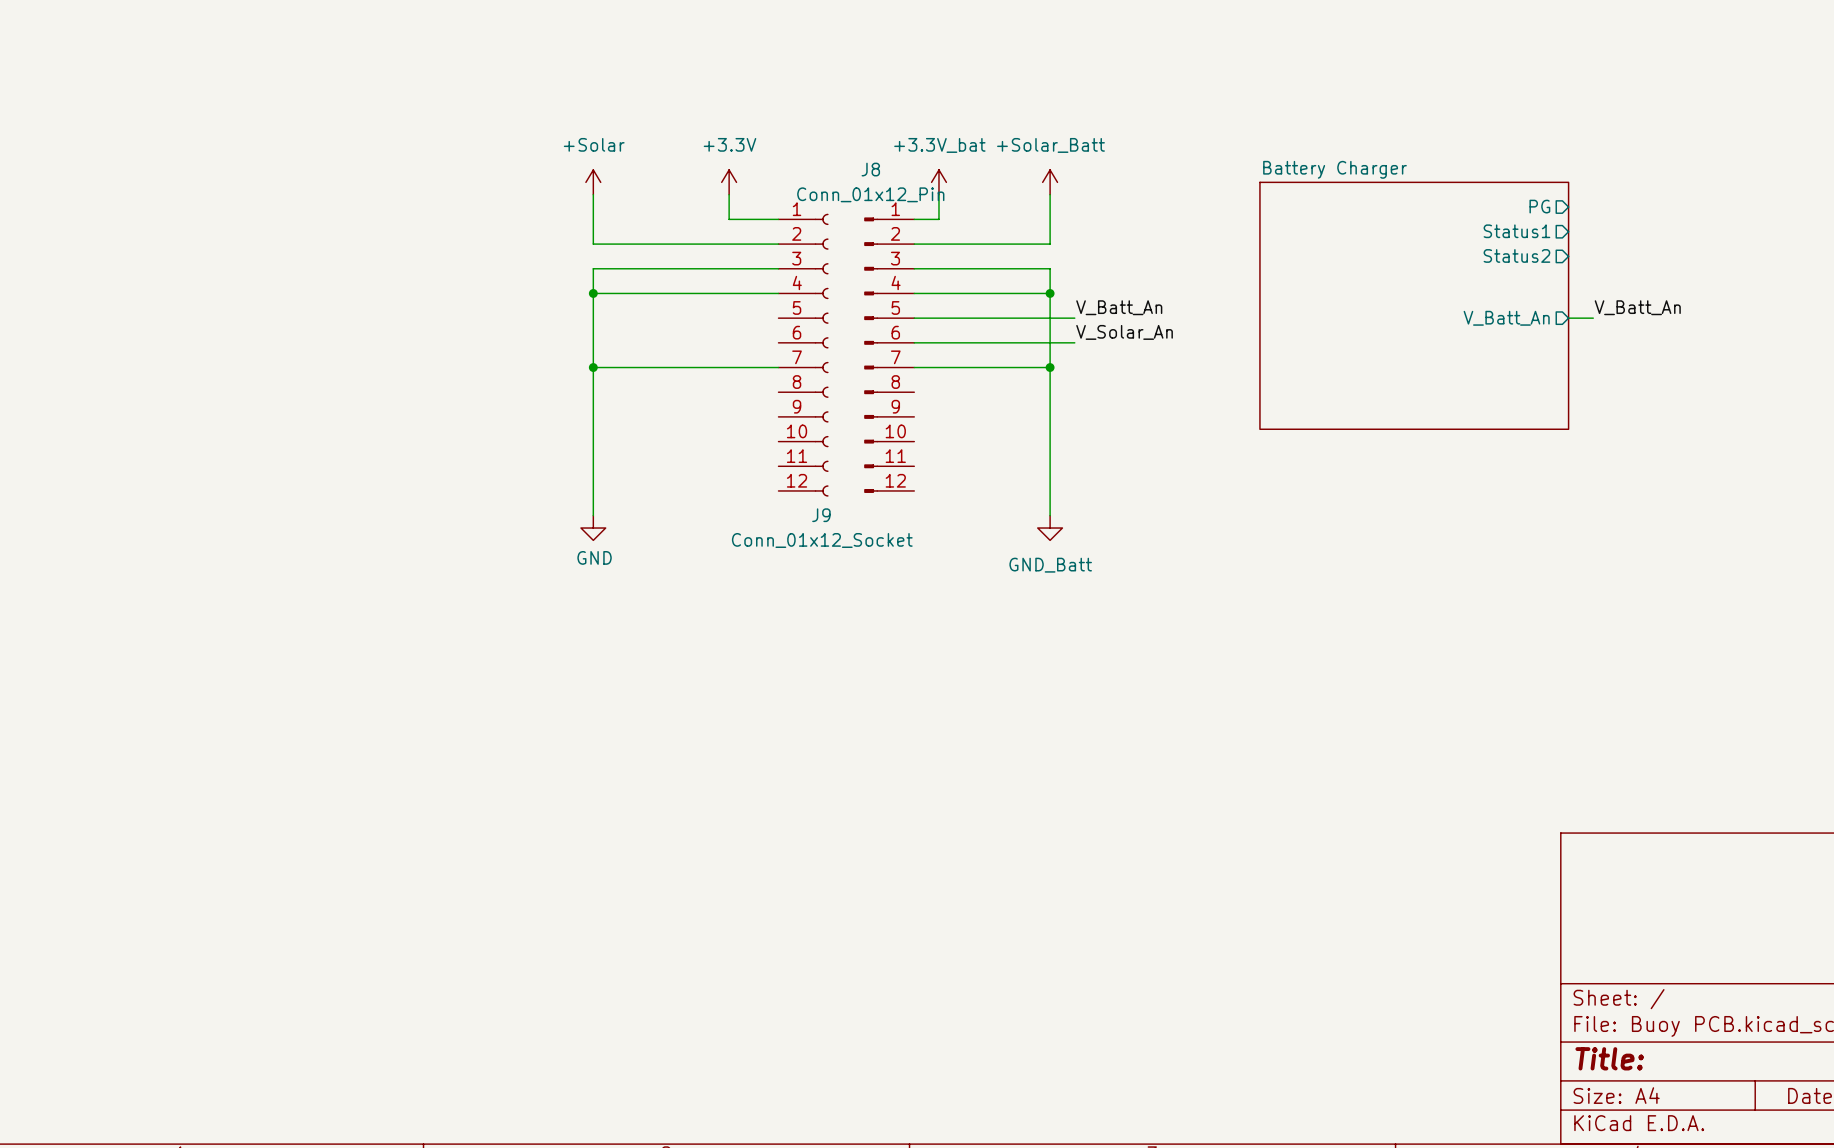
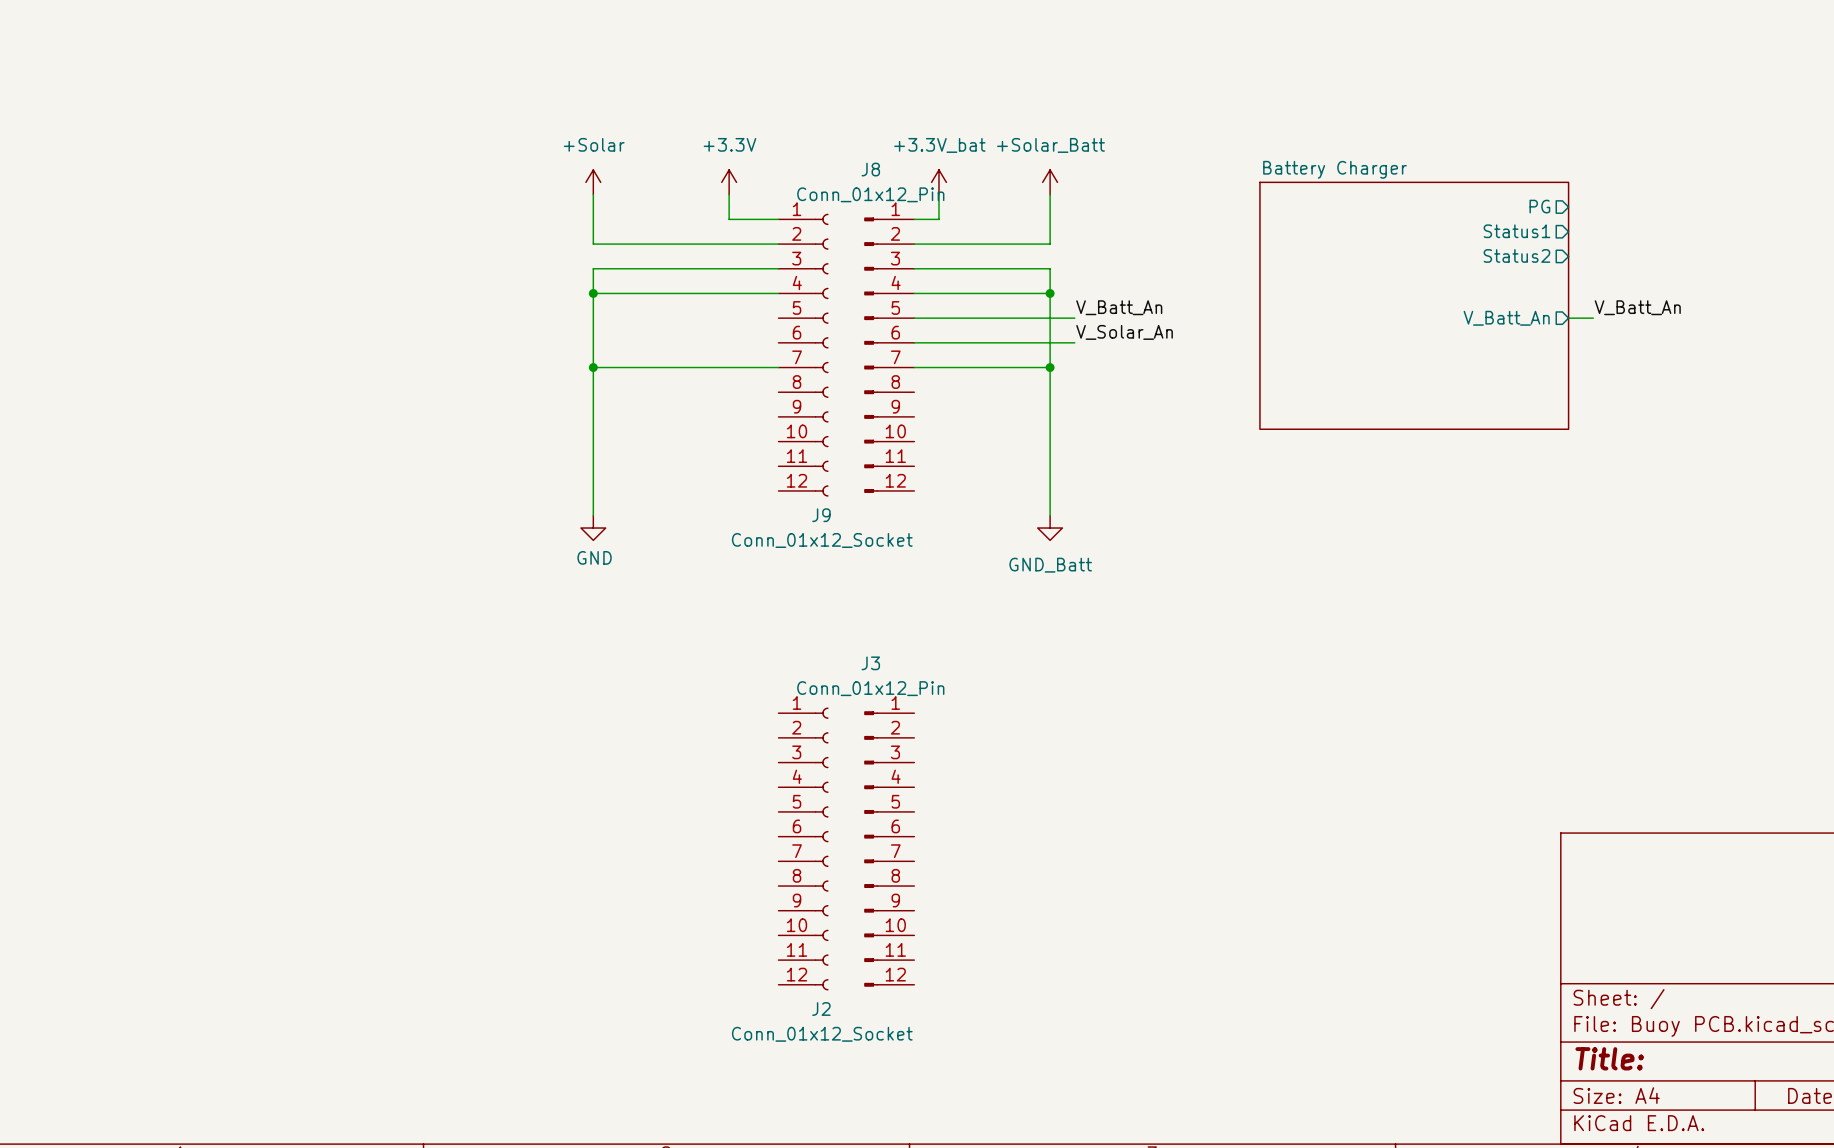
J2: none -> Conn_01x12_Socket (803, 848)
J3: none -> Conn_01x12_Pin (889, 848)

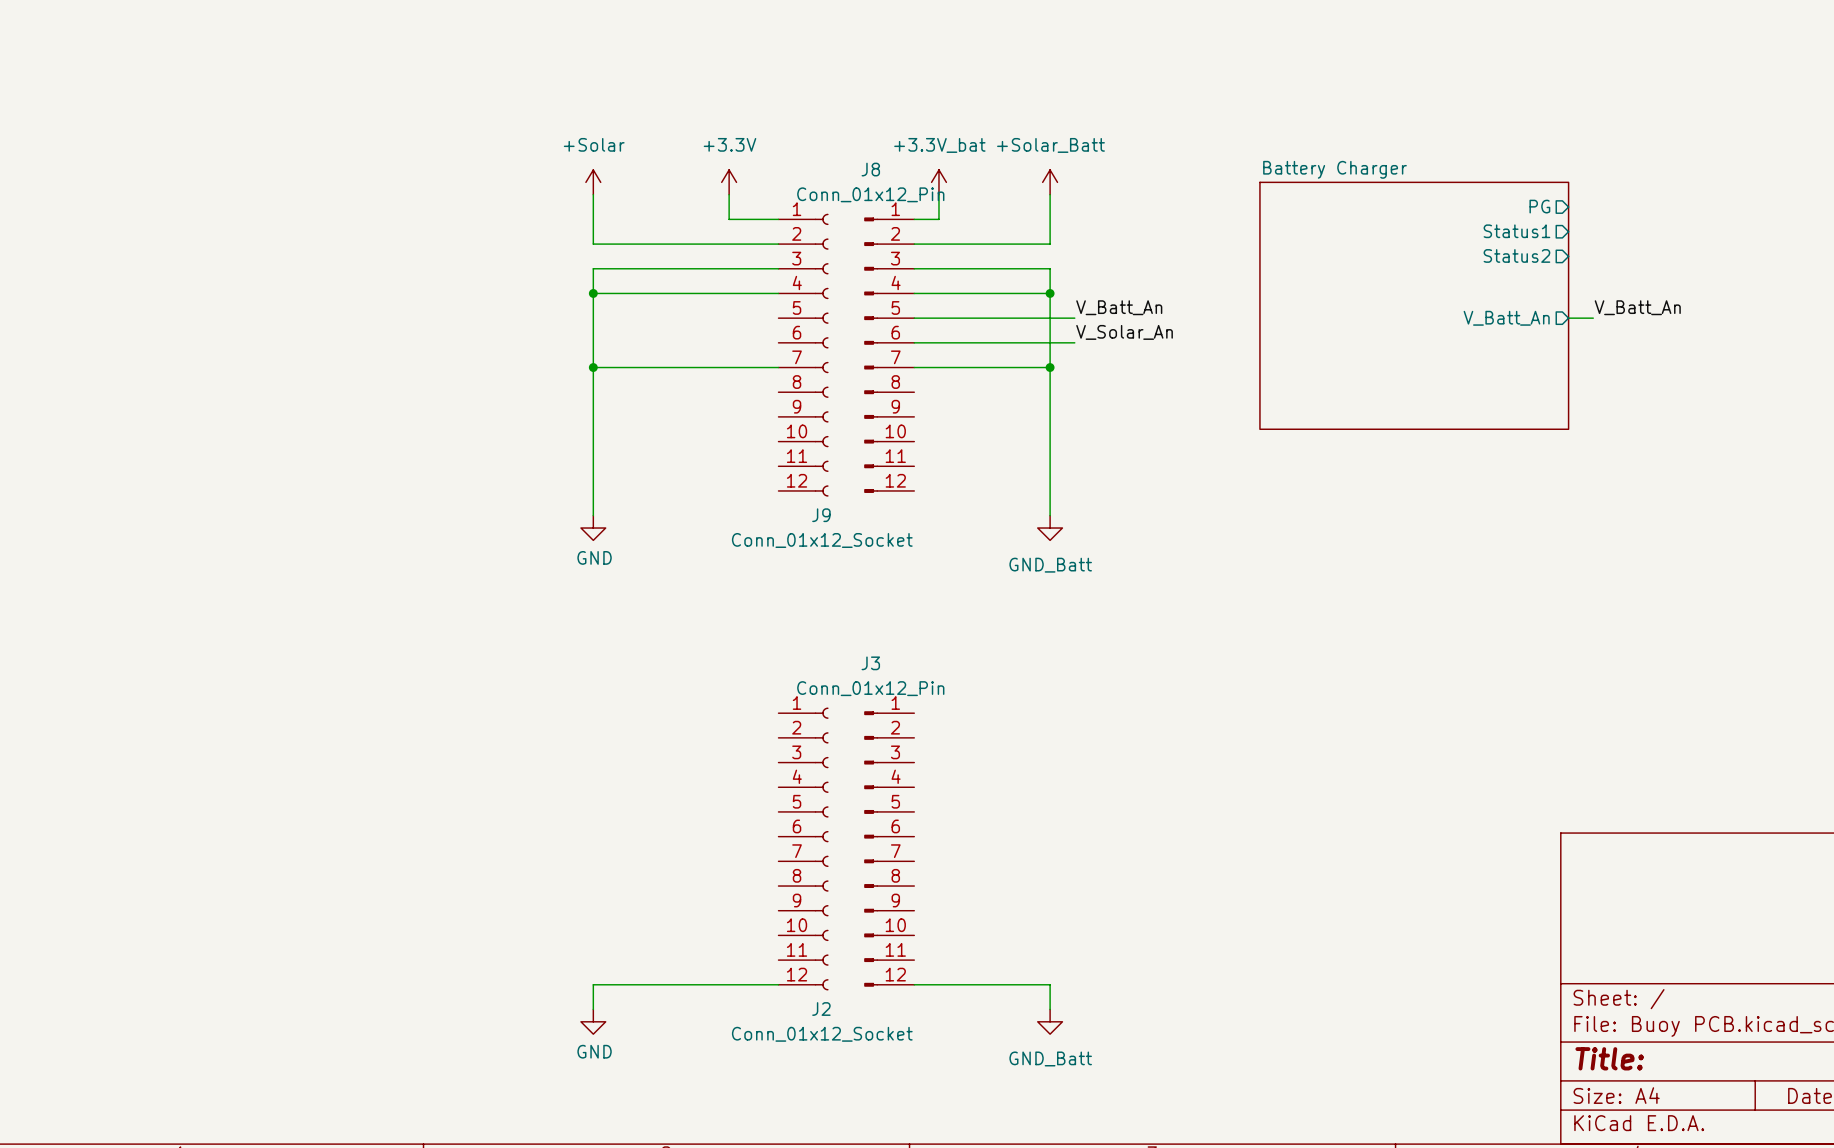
wire: none -> (778, 984) (593, 984) (593, 1009)
wire: none -> (914, 984) (1050, 984) (1050, 1009)
power symbol: none -> GND (593, 1021)
power symbol: none -> GND_Batt (1050, 1021)

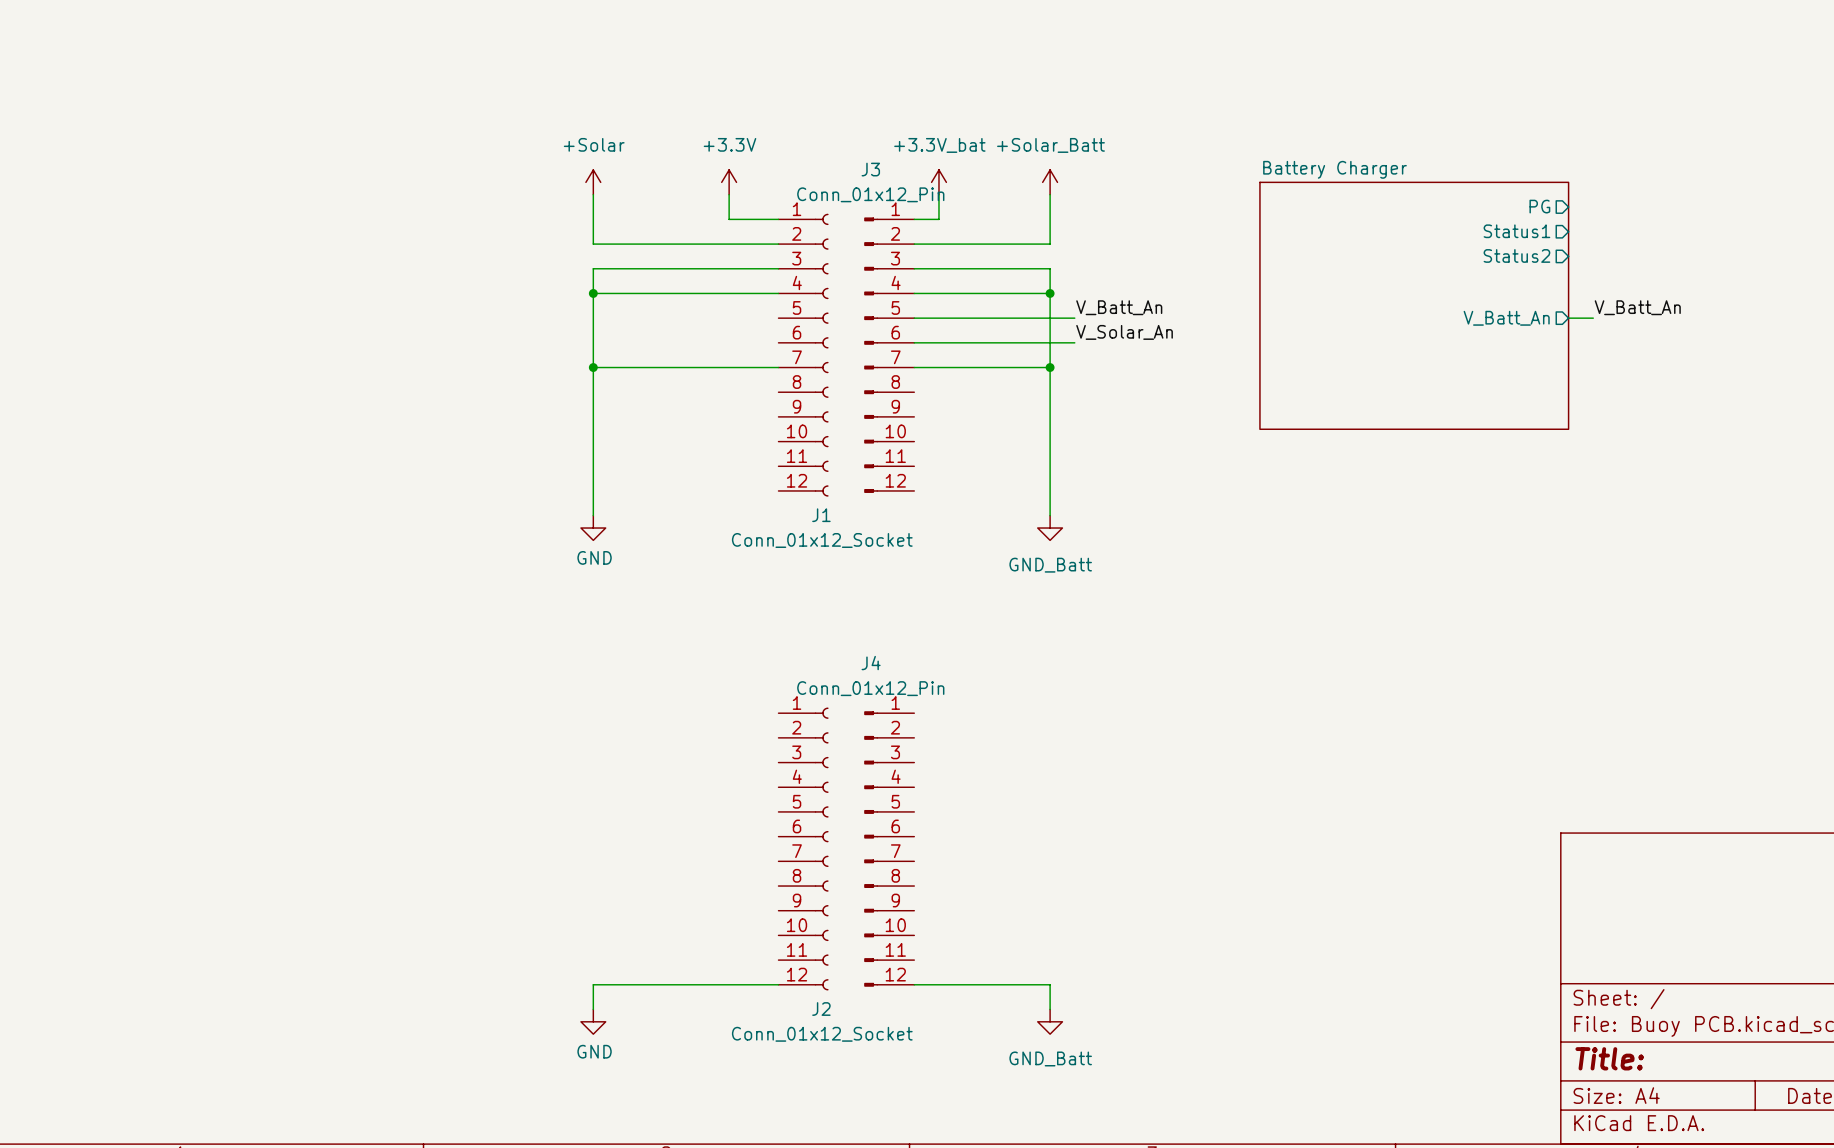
J8 name: J8 (870, 169) -> J3 (870, 169)
J9 name: J9 (821, 515) -> J1 (821, 515)
J3 name: J3 (870, 663) -> J4 (871, 663)

